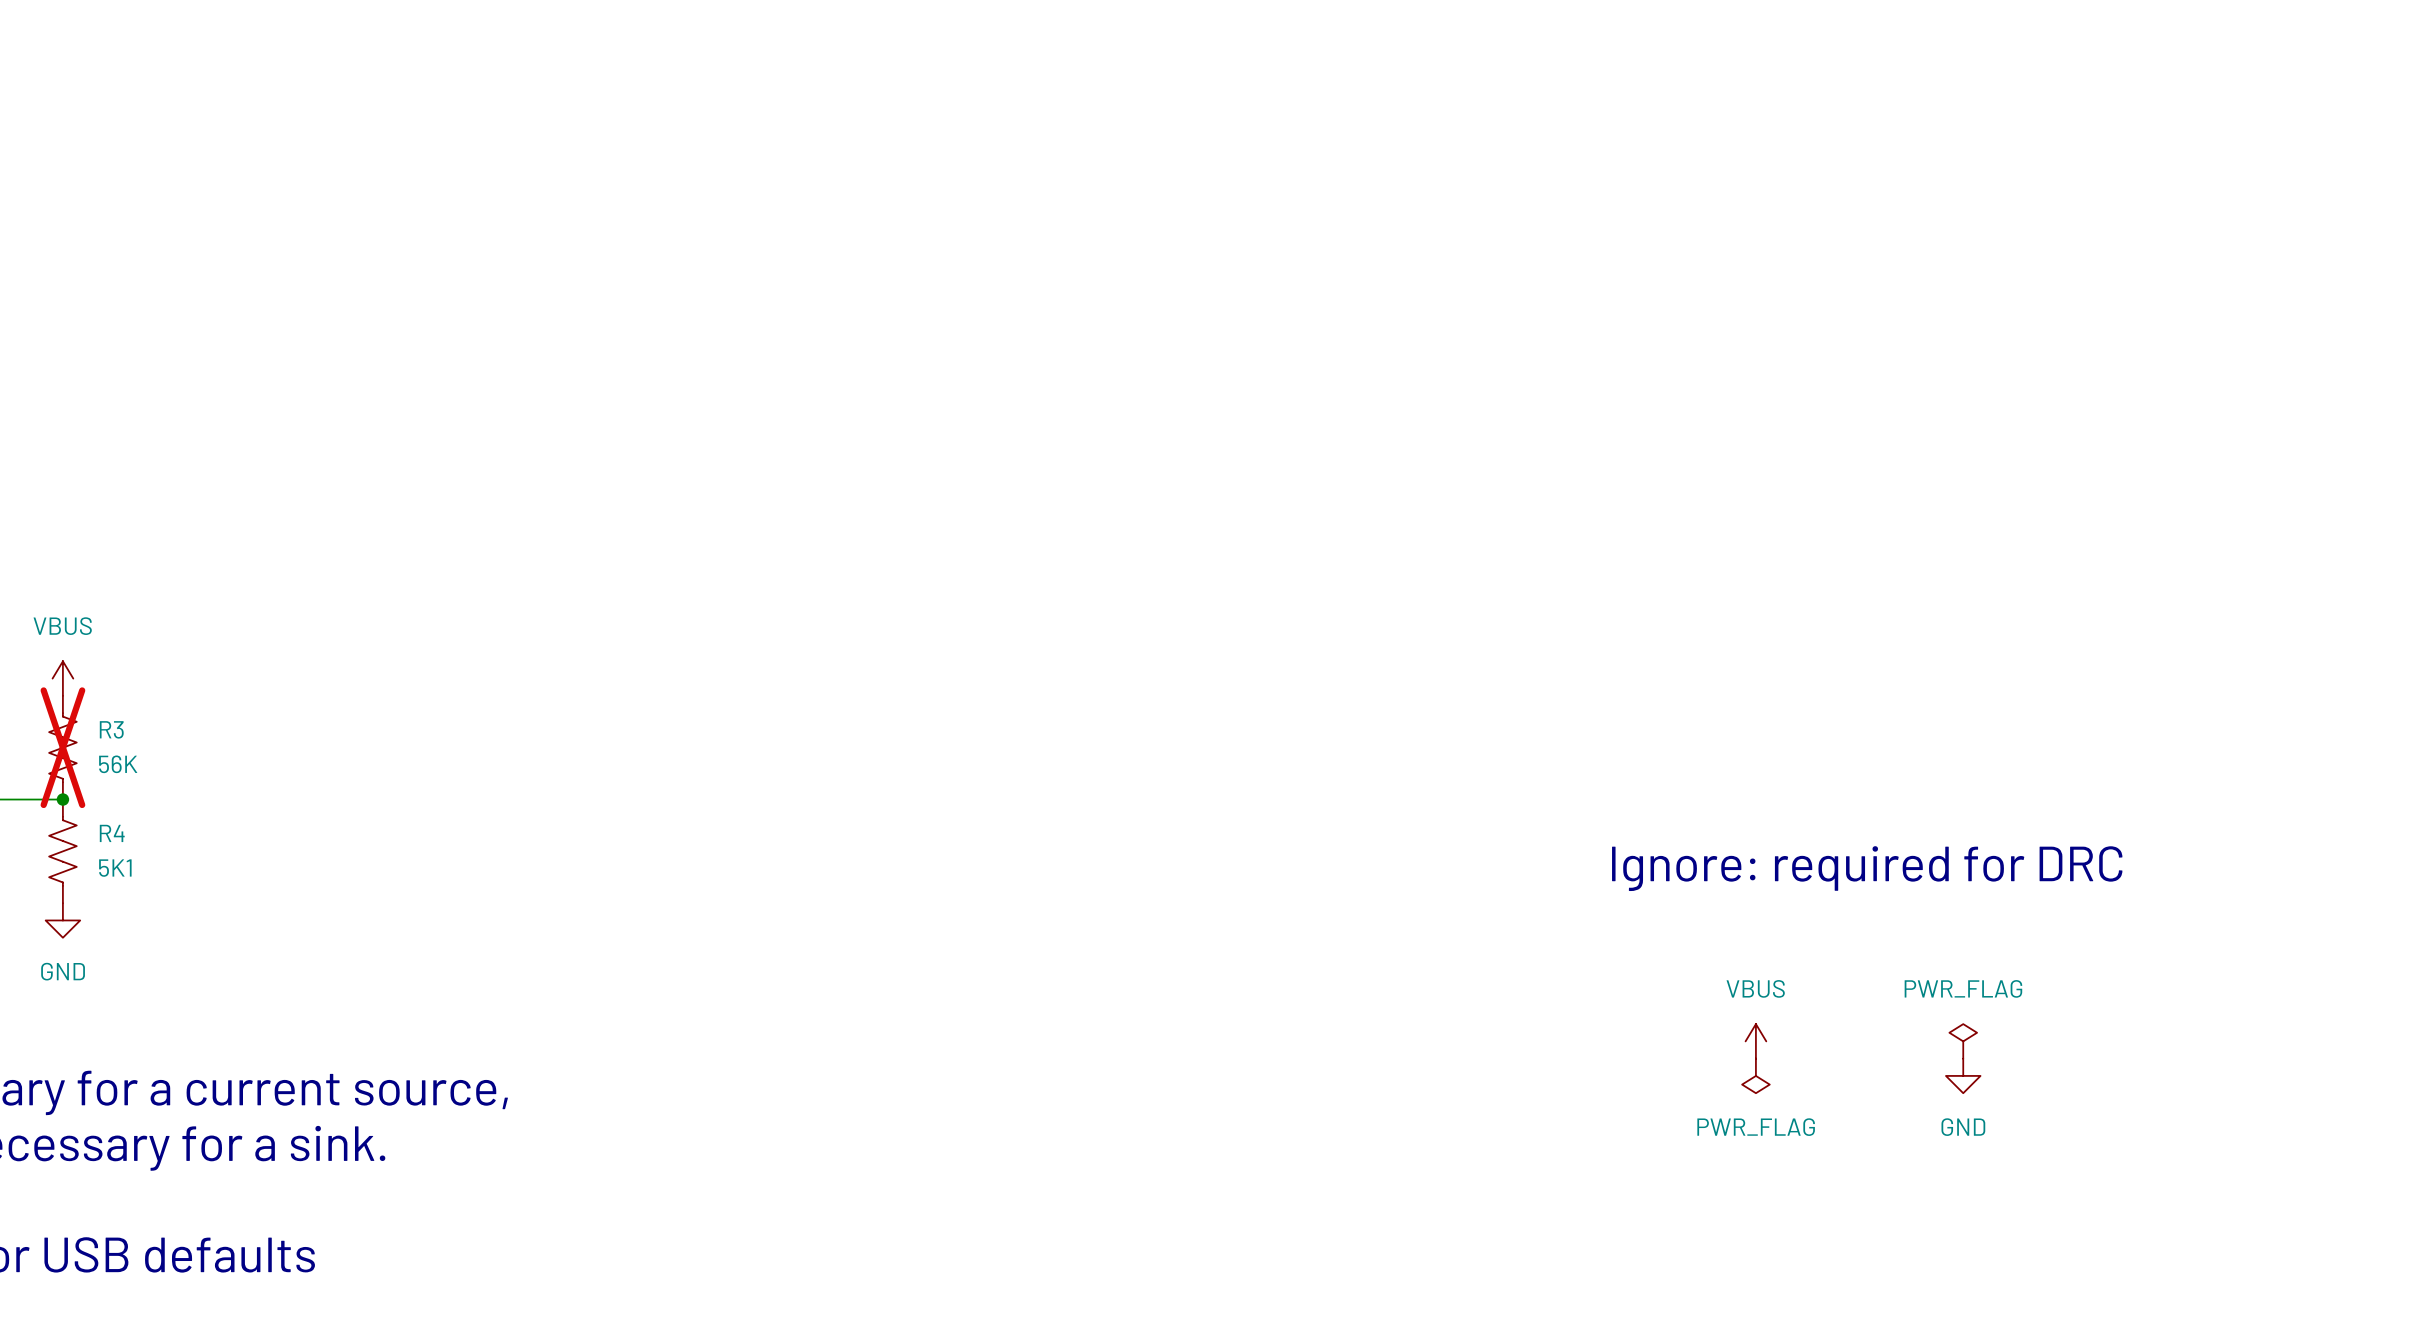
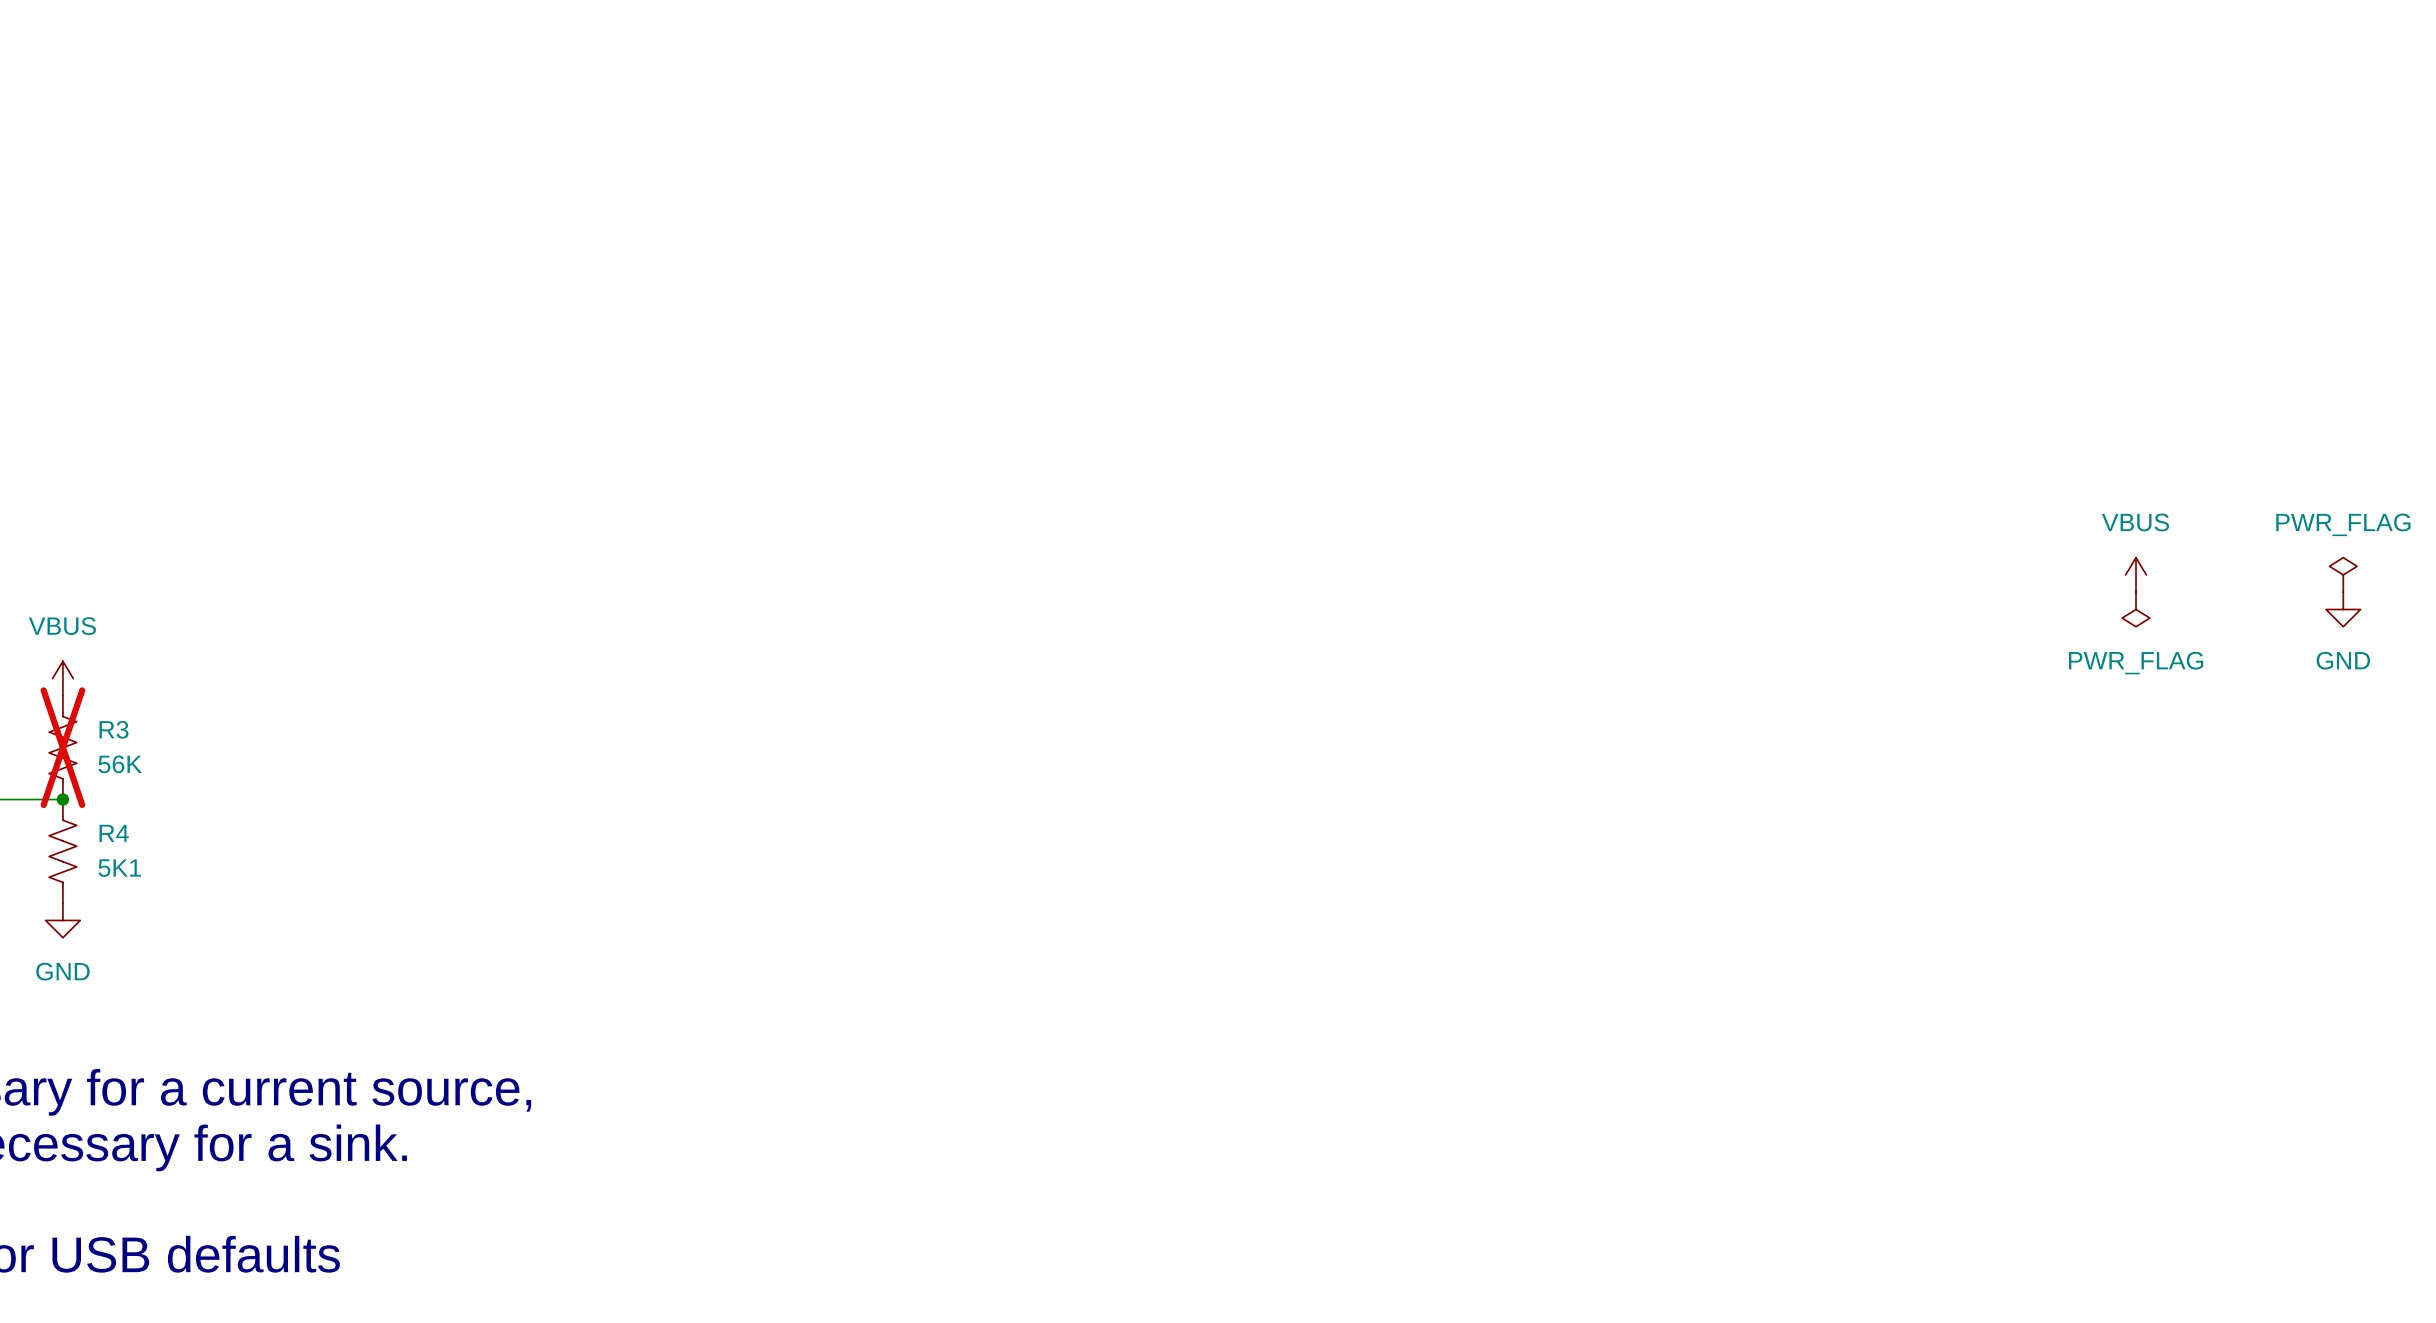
power symbol: none -> VBUS (2136, 574)
power symbol: none -> PWR_FLAG (2343, 574)
power symbol: none -> PWR_FLAG (2136, 609)
power symbol: none -> GND (2343, 609)
text: Ignore: required for DRC (1867, 868) -> none
power symbol: VBUS (1755, 1041) -> none
power symbol: PWR_FLAG (1963, 1041) -> none
power symbol: PWR_FLAG (1755, 1075) -> none
power symbol: GND (1963, 1075) -> none

